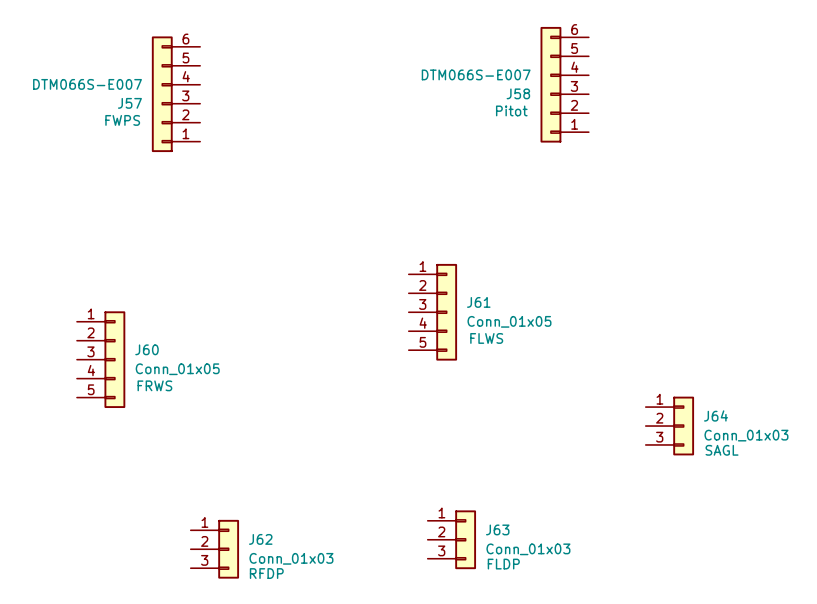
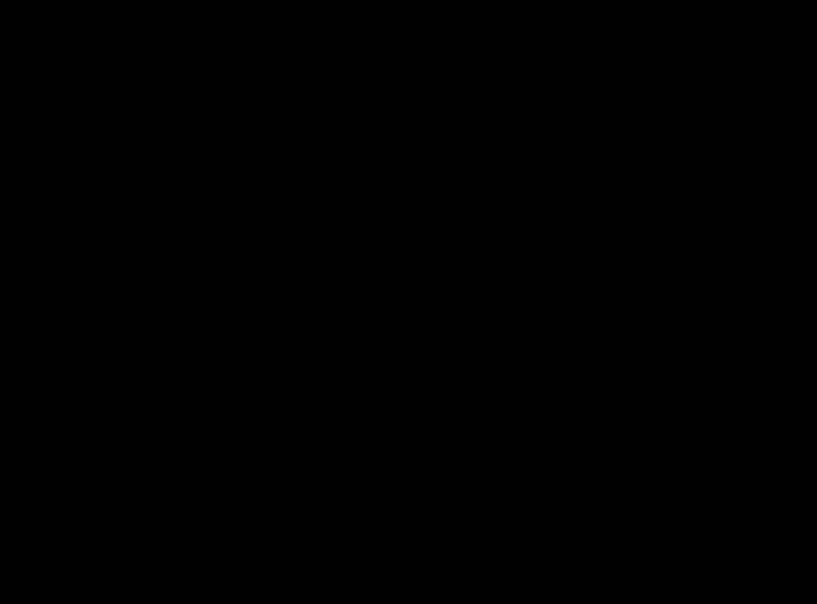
J58: DTM066S-E007 (564, 84) -> none
J57: DTM066S-E007 (176, 94) -> none
J61: Conn_01x05 (432, 312) -> none
J60: Conn_01x05 (101, 359) -> none
J64: Conn_01x03 (669, 426) -> none
J63: Conn_01x03 (451, 539) -> none
J62: Conn_01x03 (214, 549) -> none

